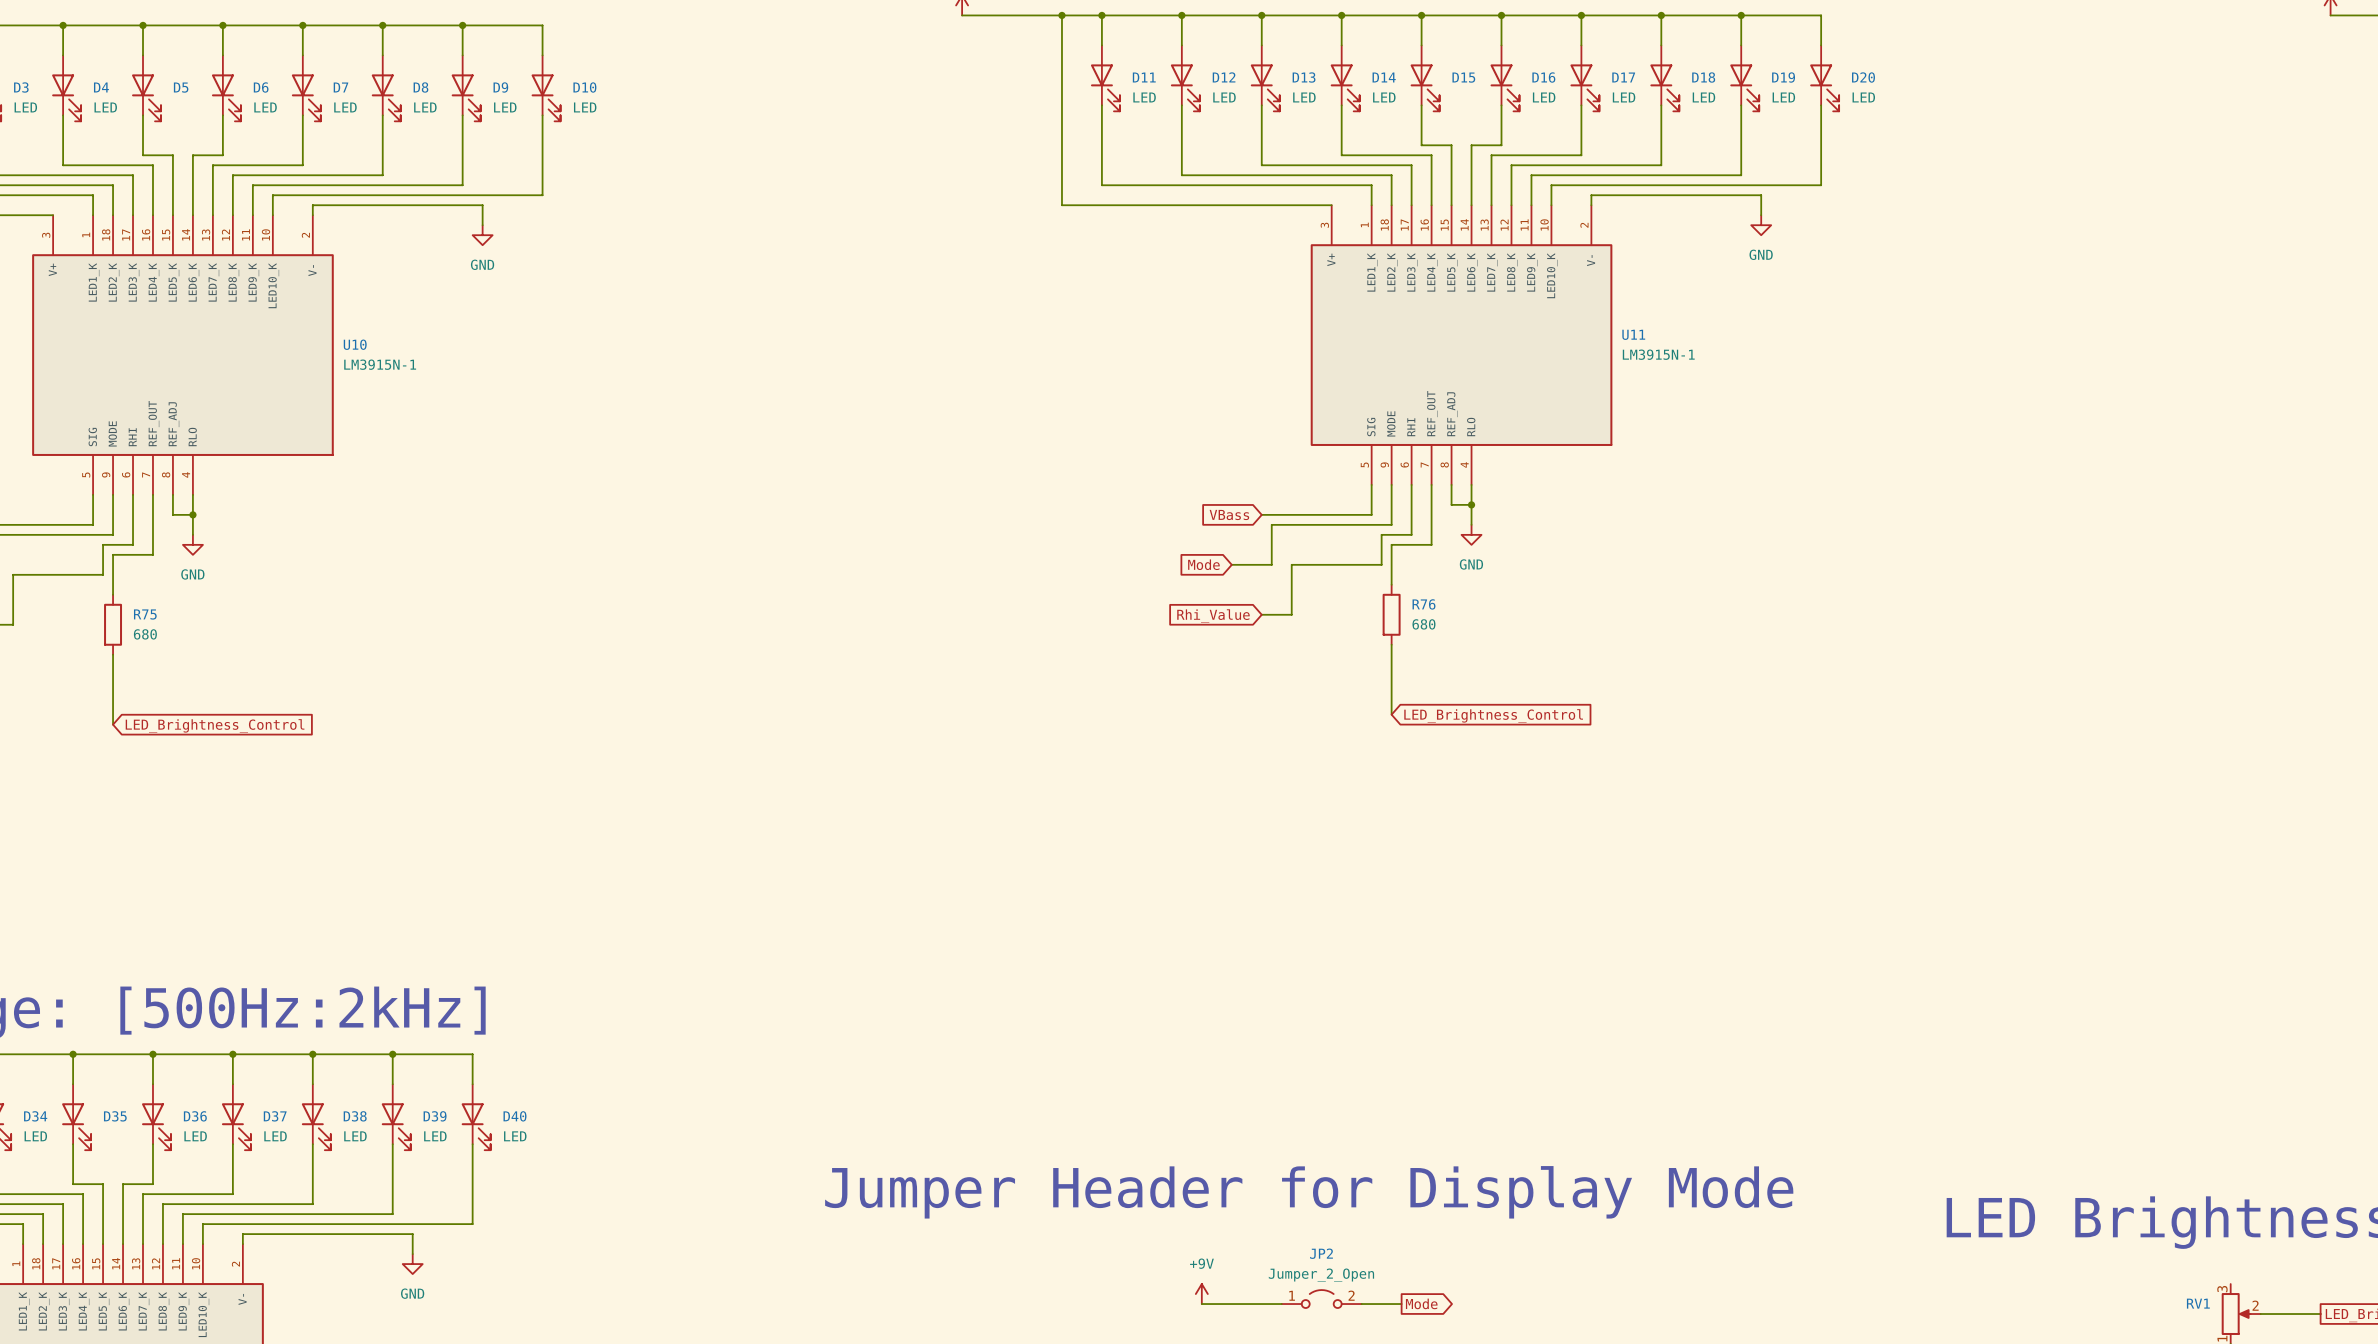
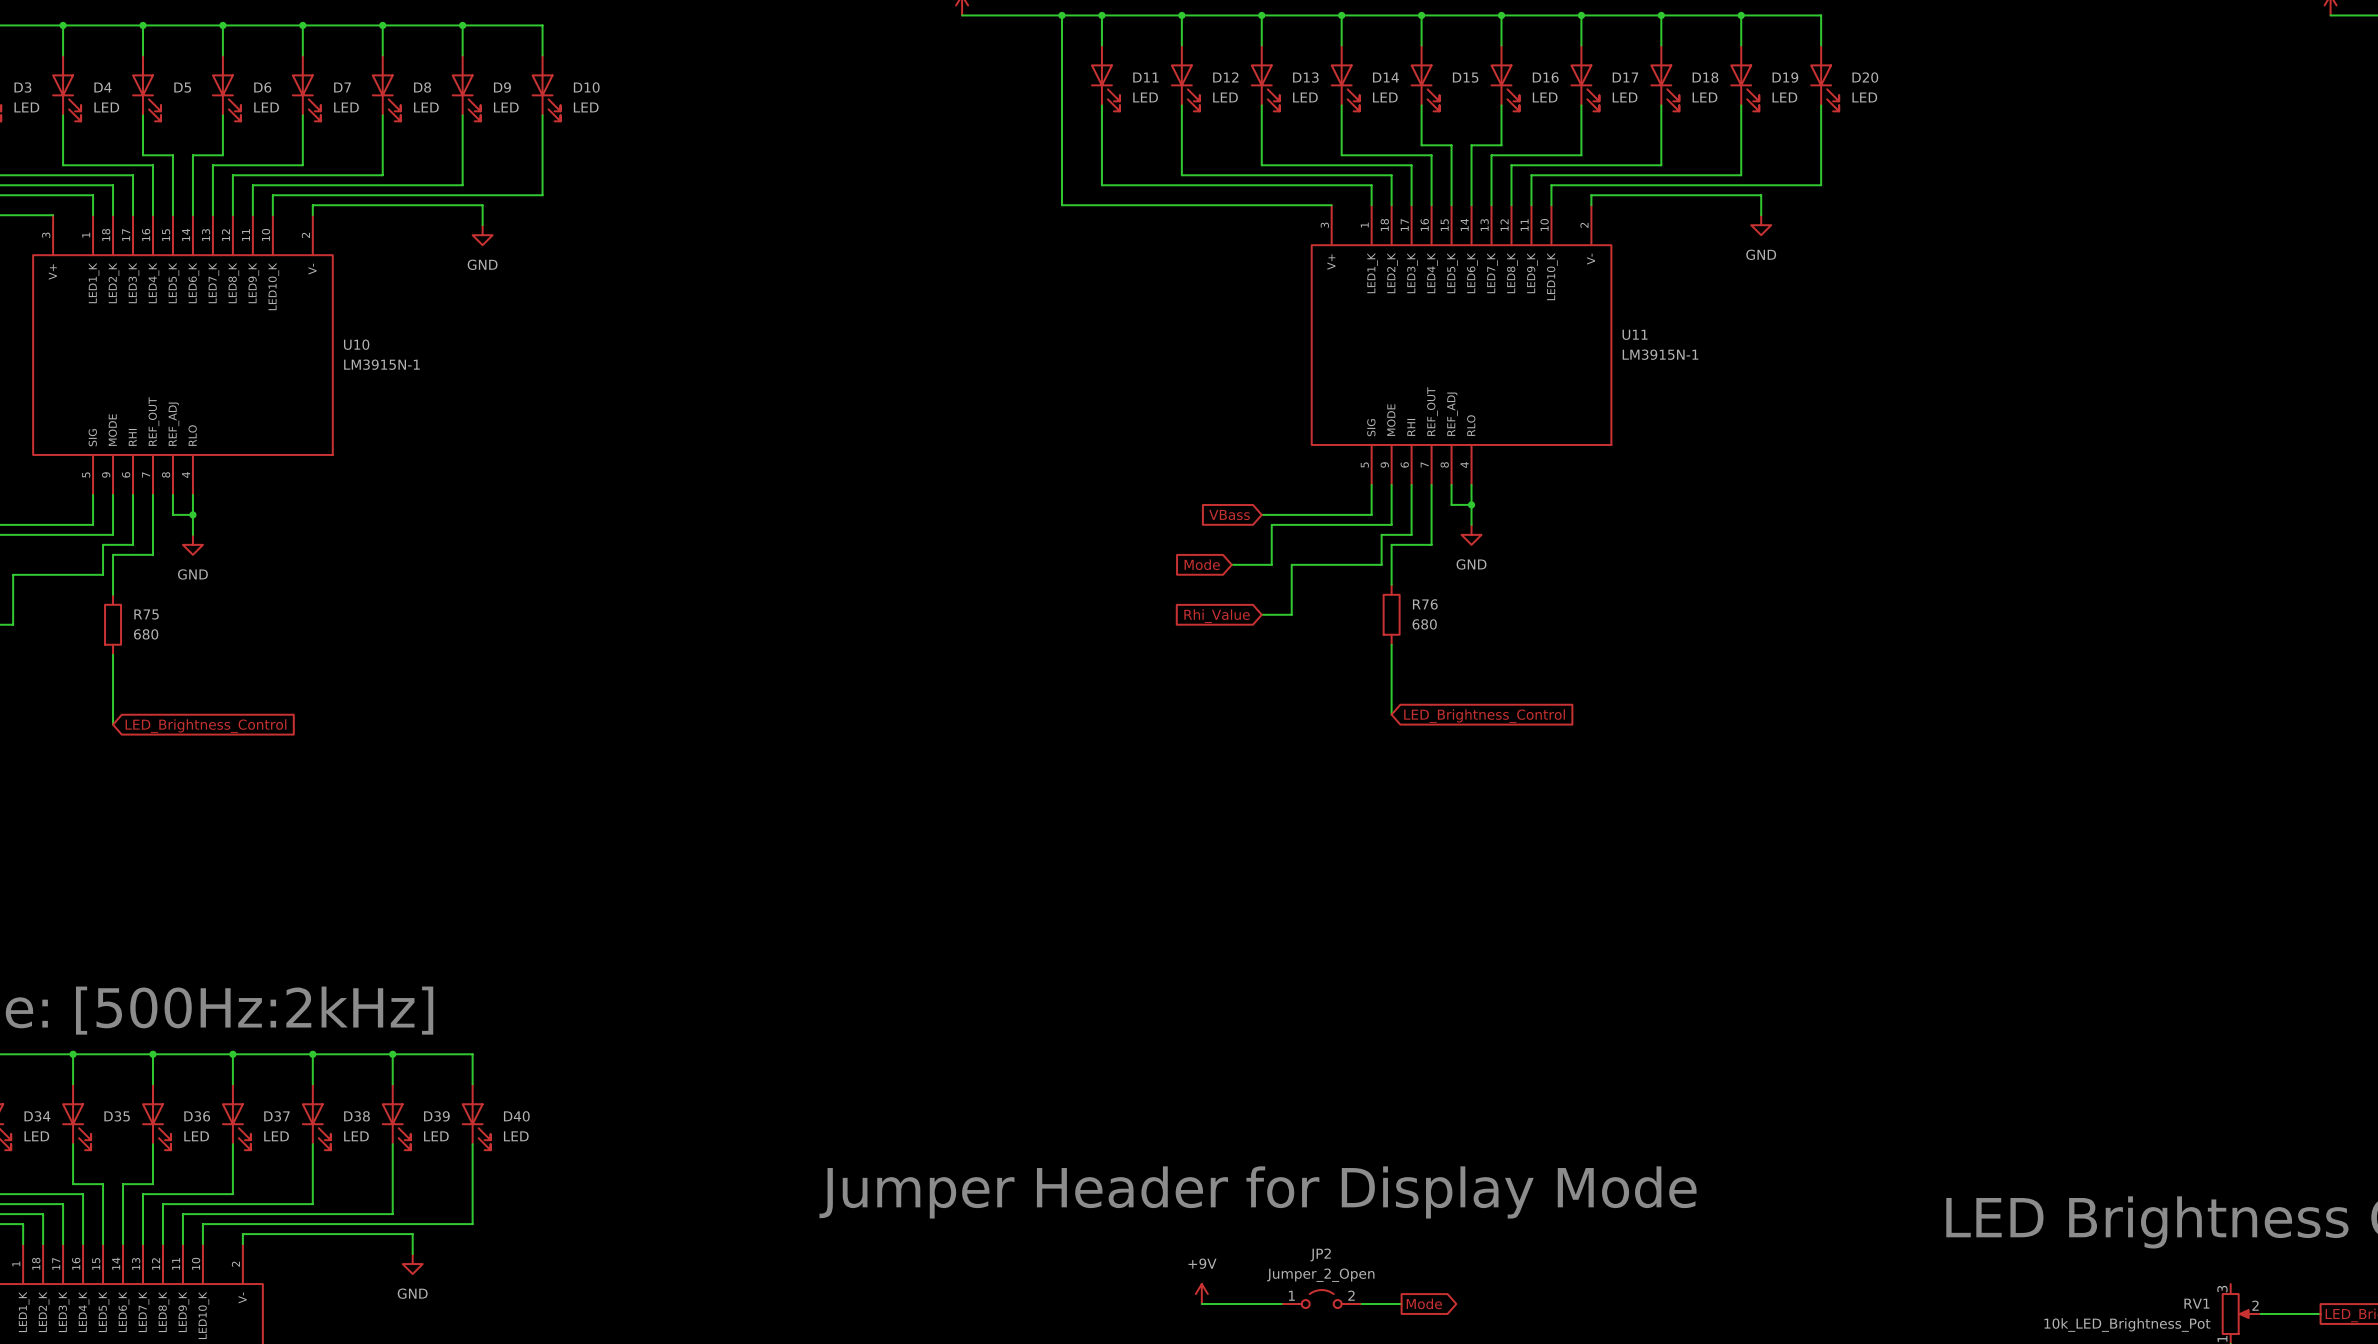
RV1 value: none -> 10k_LED_Brightness_Pot (2127, 1325)

